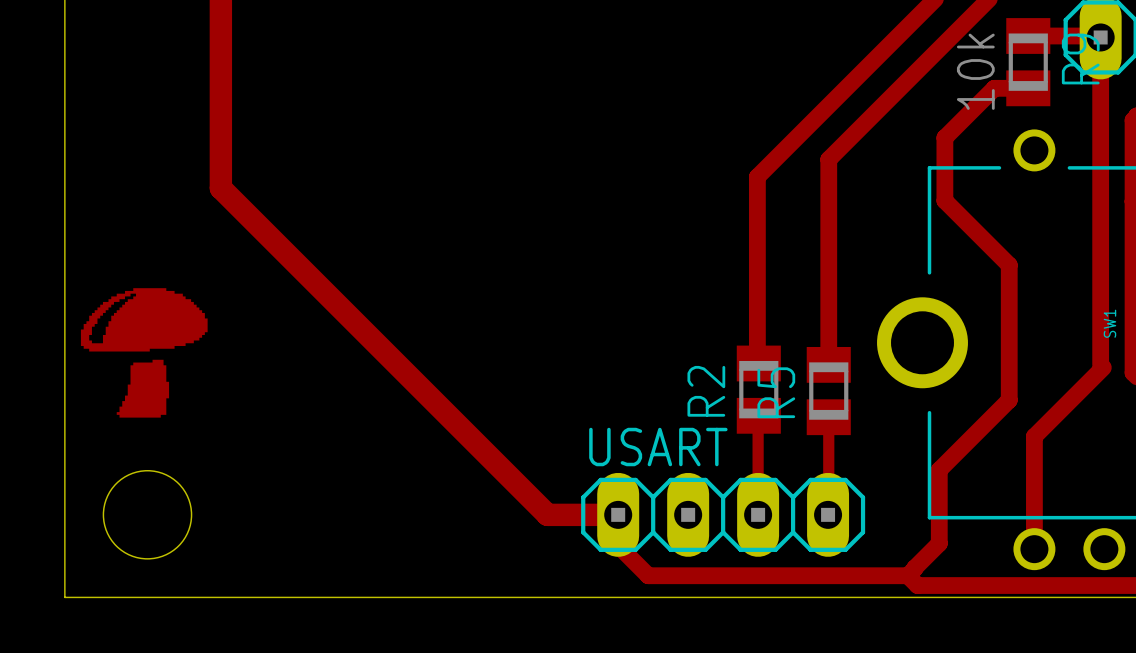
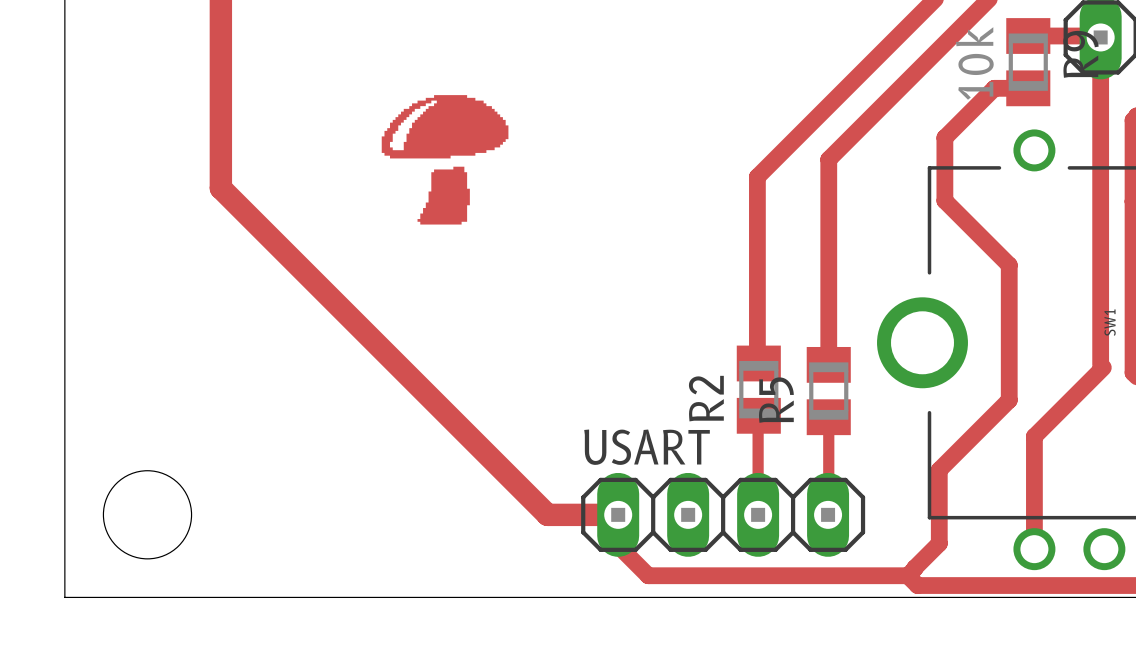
drawing position: (144, 352) -> (445, 159)

